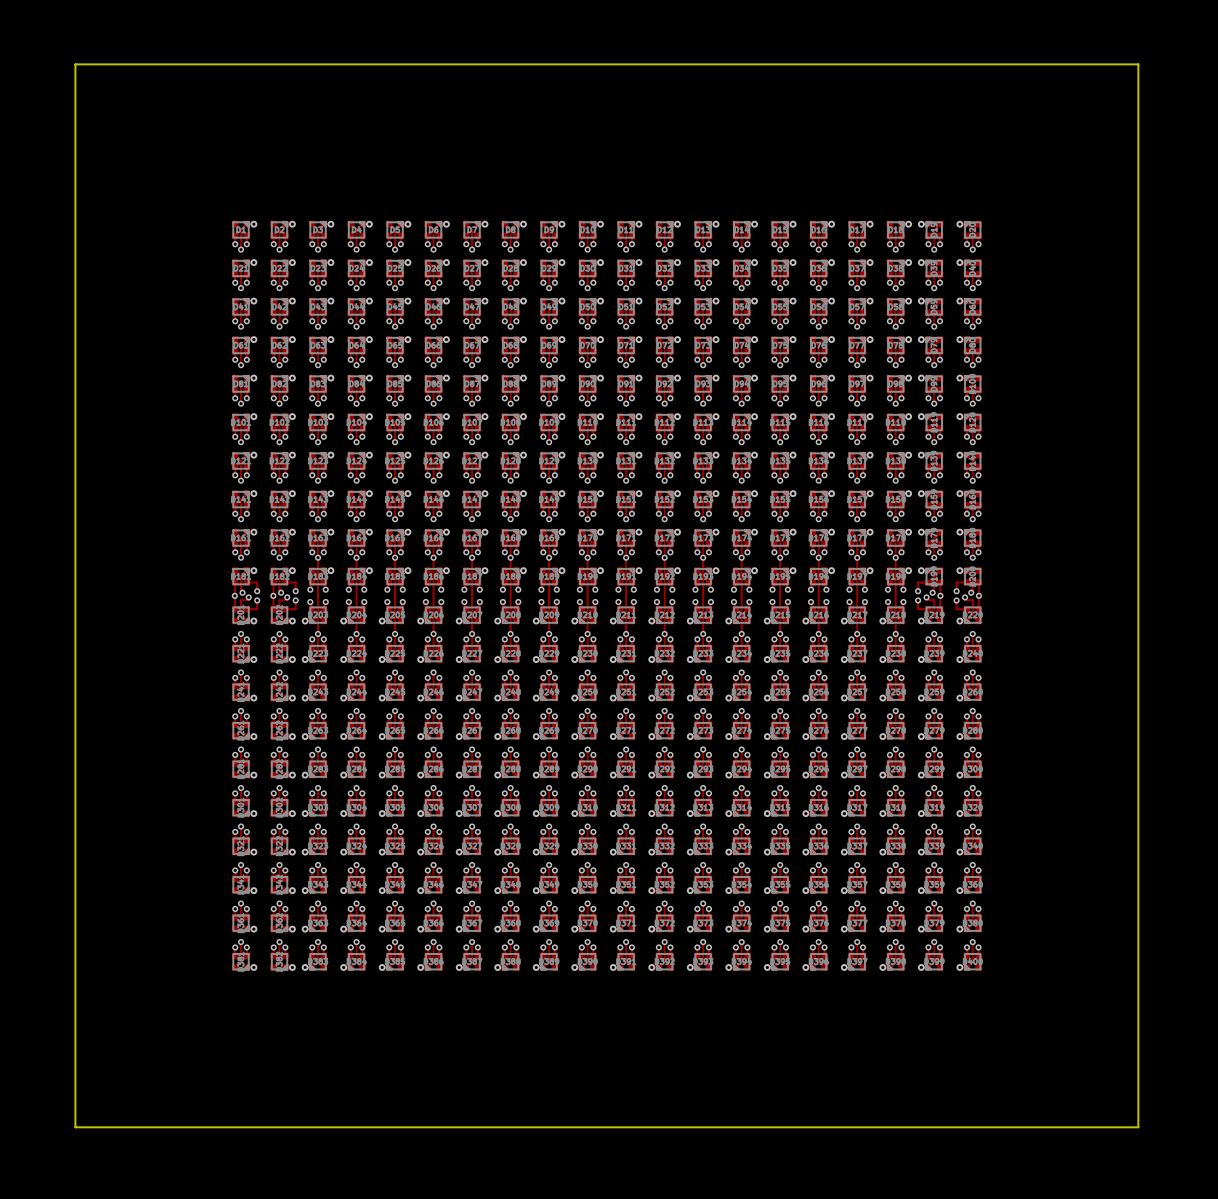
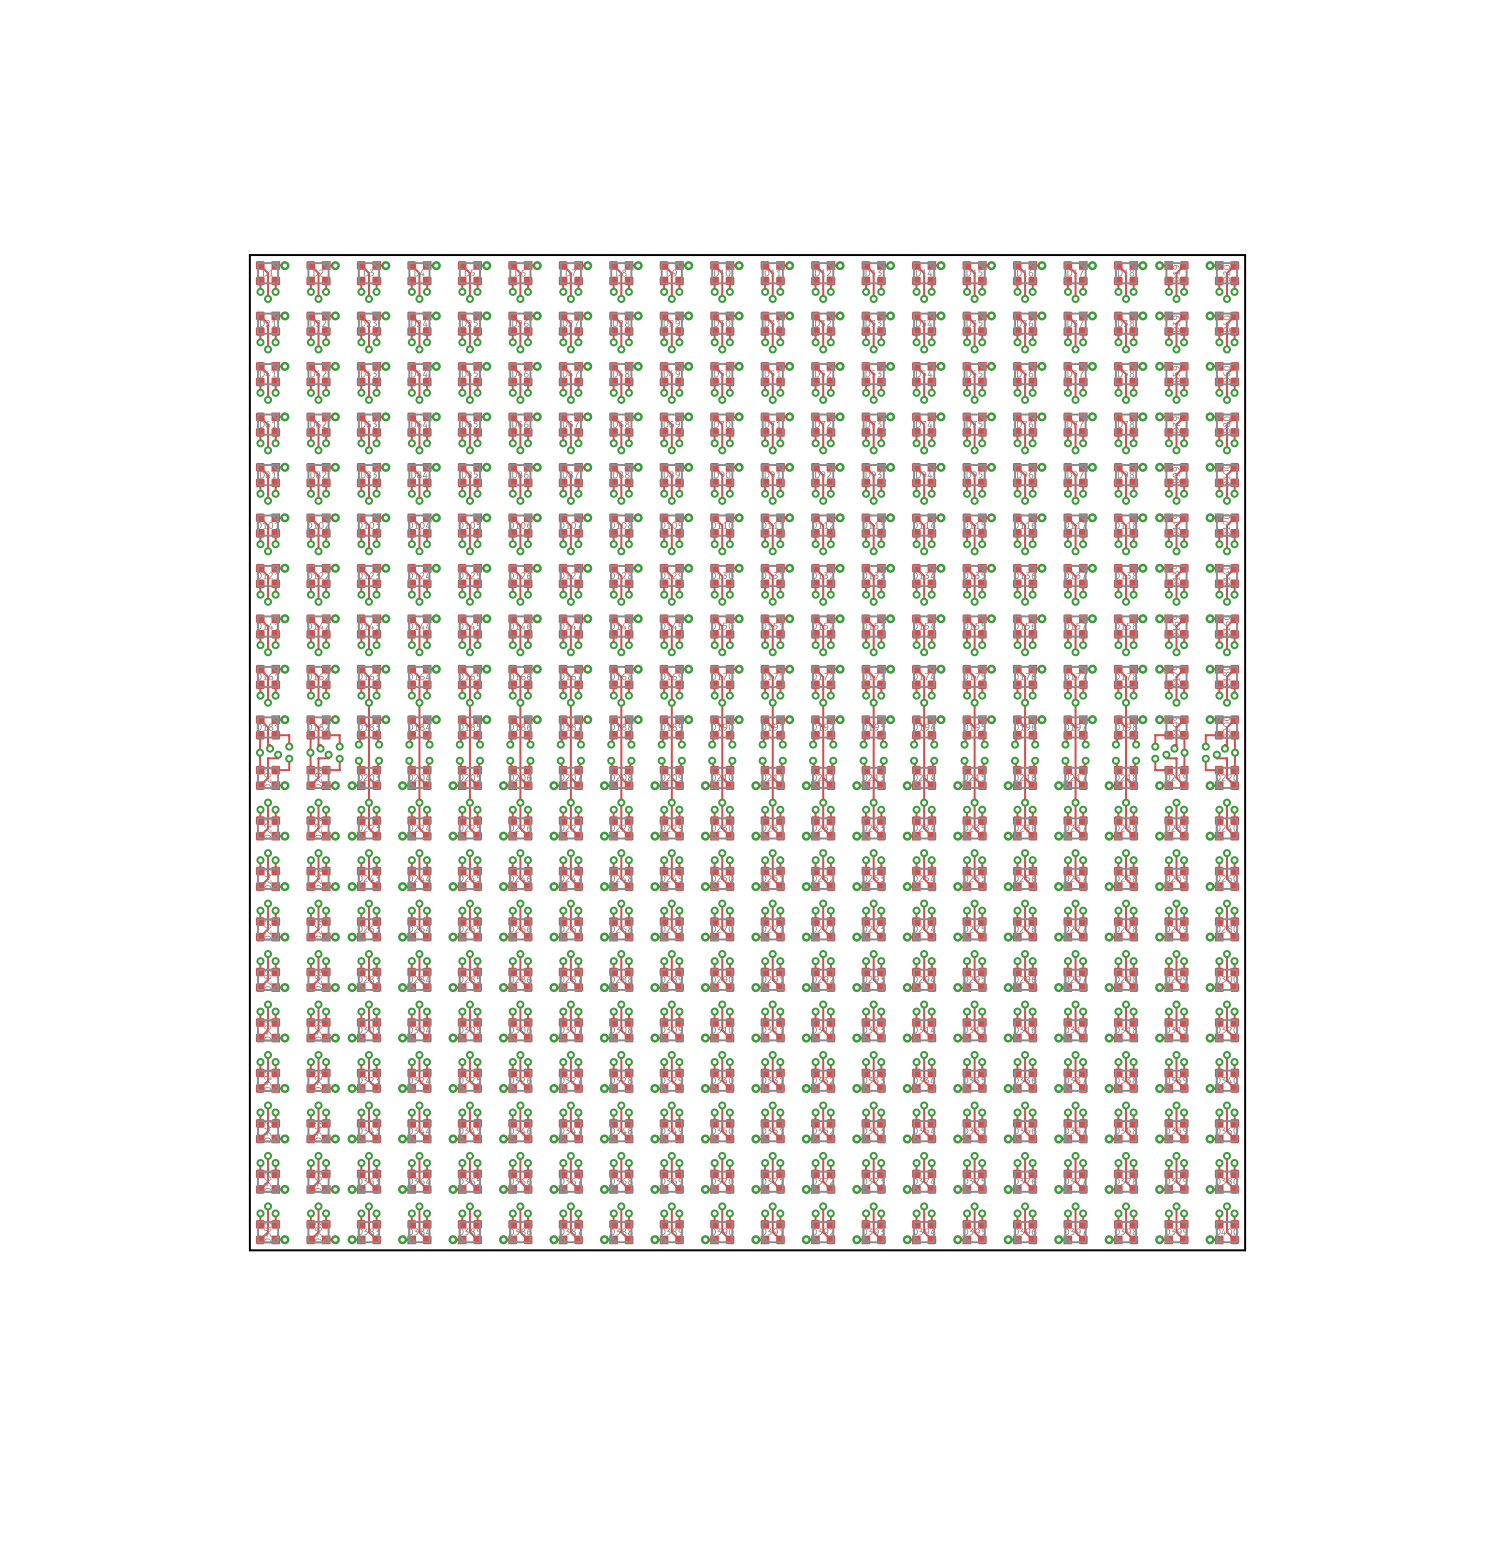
board edge: (75, 64) (1138, 64) (1138, 1127) (75, 1127) (75, 64) -> (249, 255) (249, 1250) (1245, 1250) (1245, 255) (249, 255)

